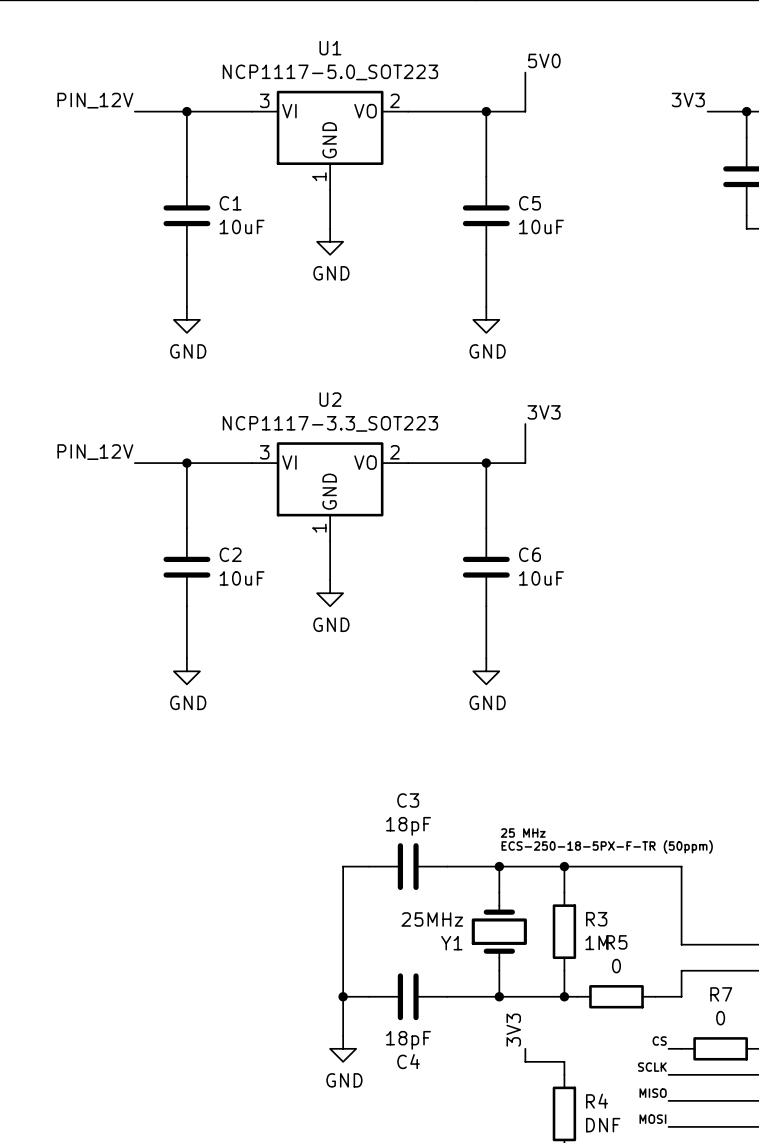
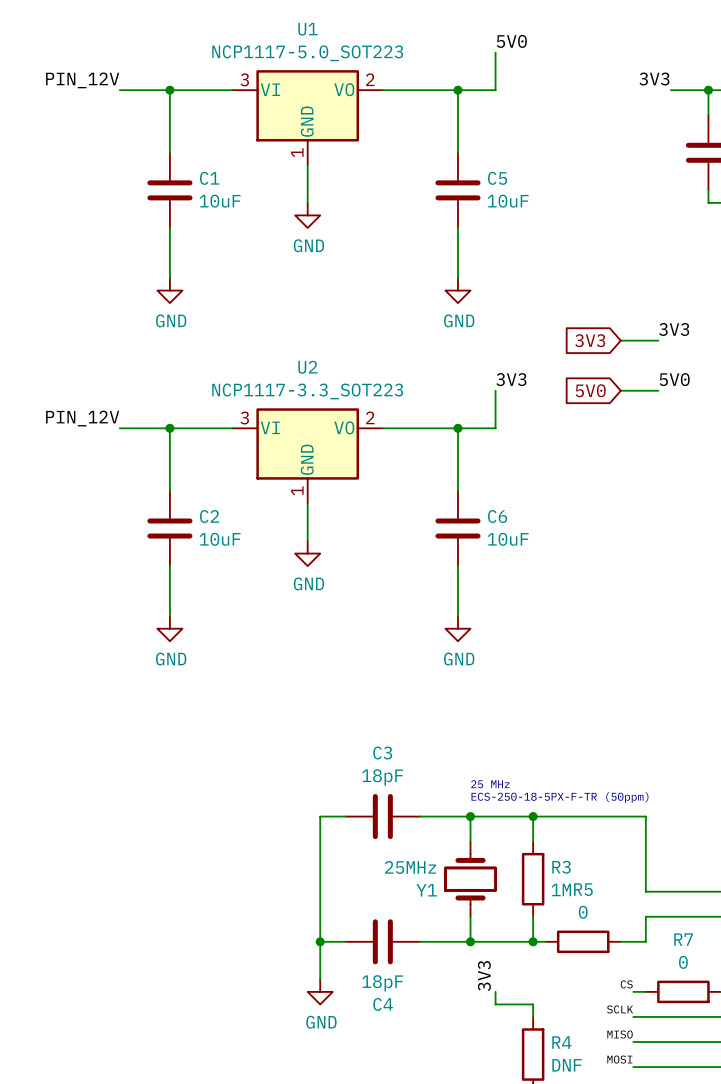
label: none -> 3V3 (674, 329)
global label: none -> 3V3 (590, 340)
wire: none -> (620, 340) (658, 340)
label: none -> 5V0 (674, 379)
global label: none -> 5V0 (590, 390)
wire: none -> (620, 390) (658, 390)

